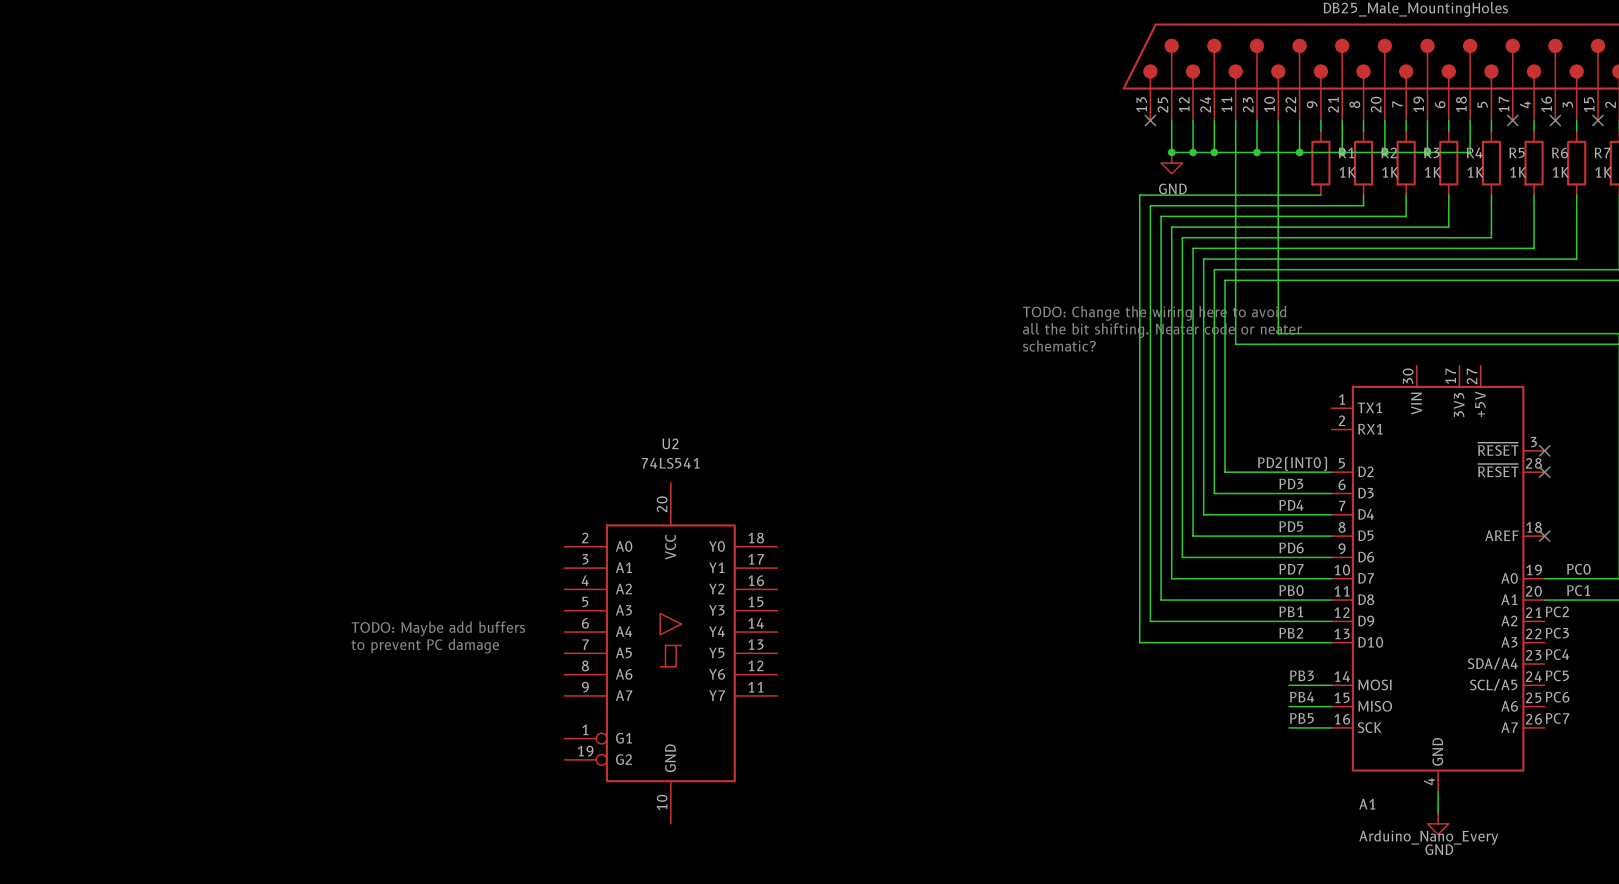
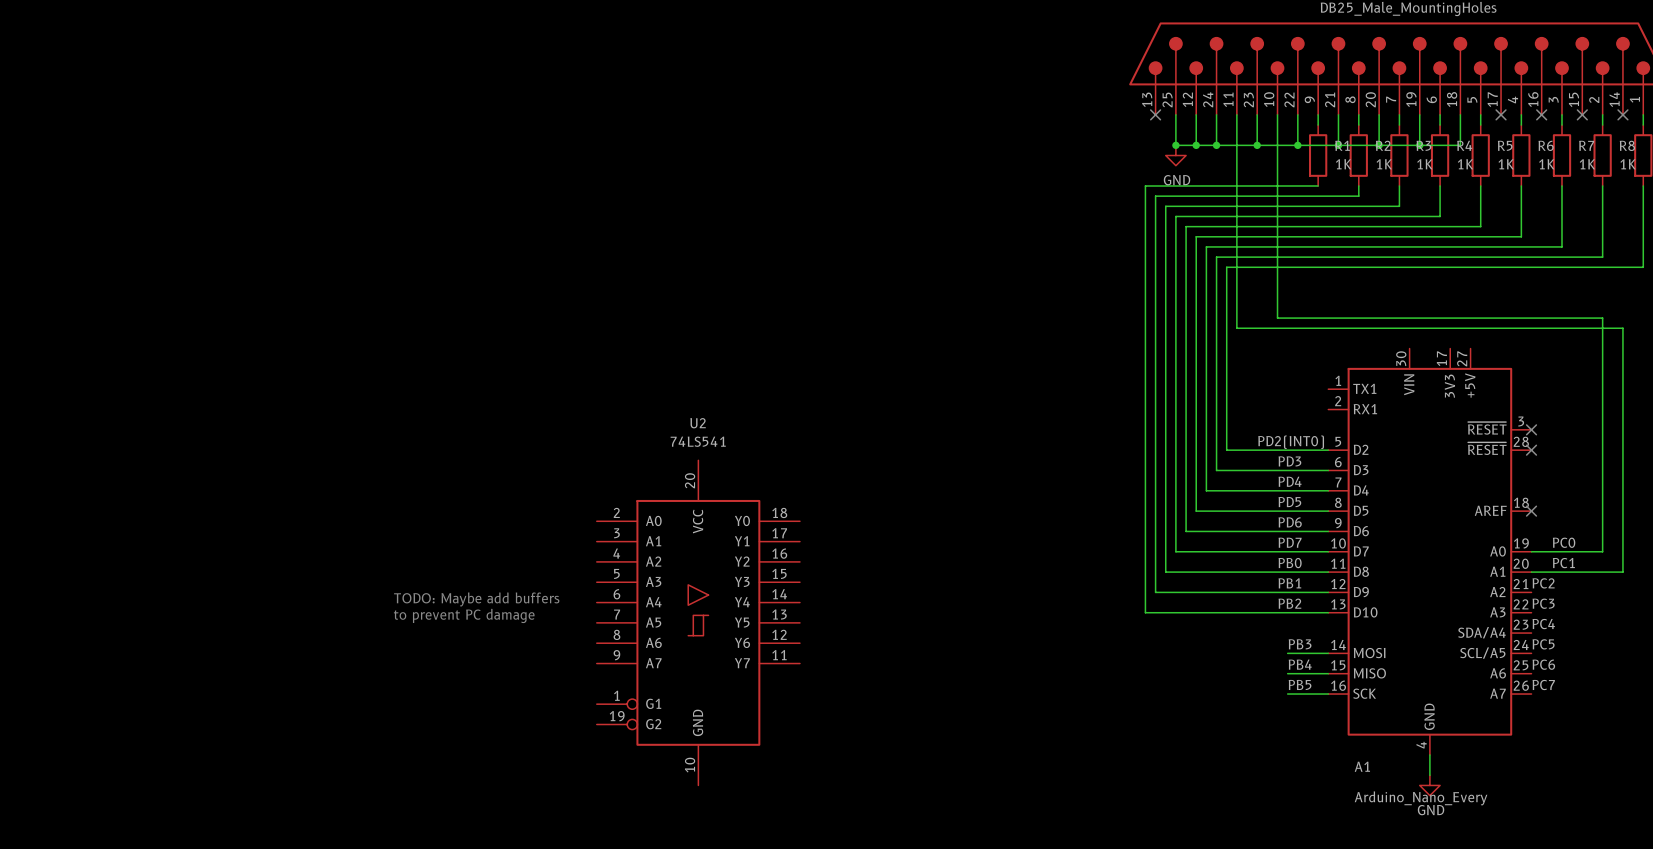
text: TODO: Change the wiring here to avoid (1154, 313) -> none
text: all the bit shifting. Neater code or neater (1162, 330) -> none
text: schematic? (1059, 345) -> none

